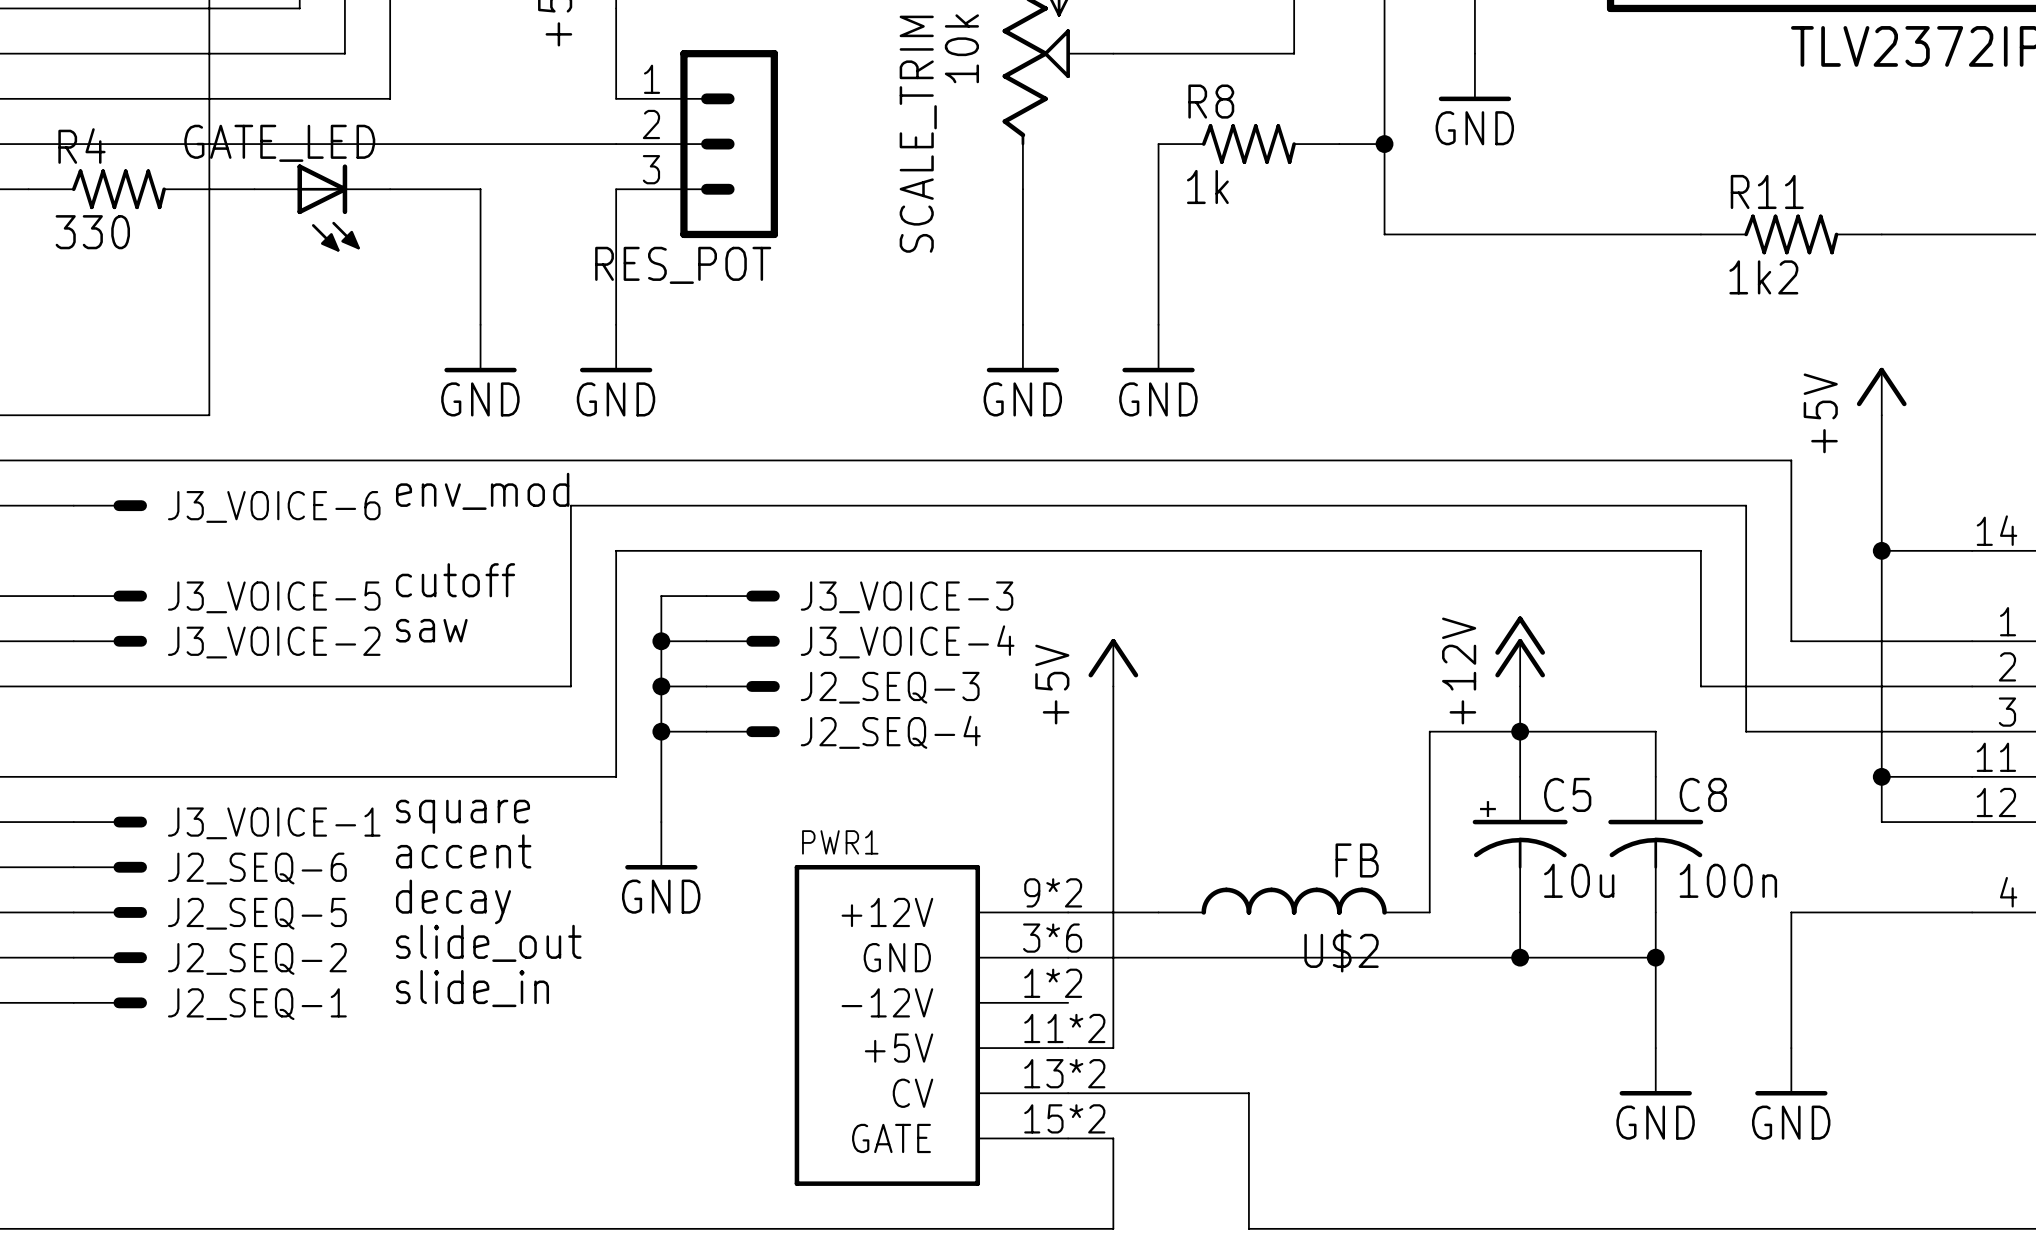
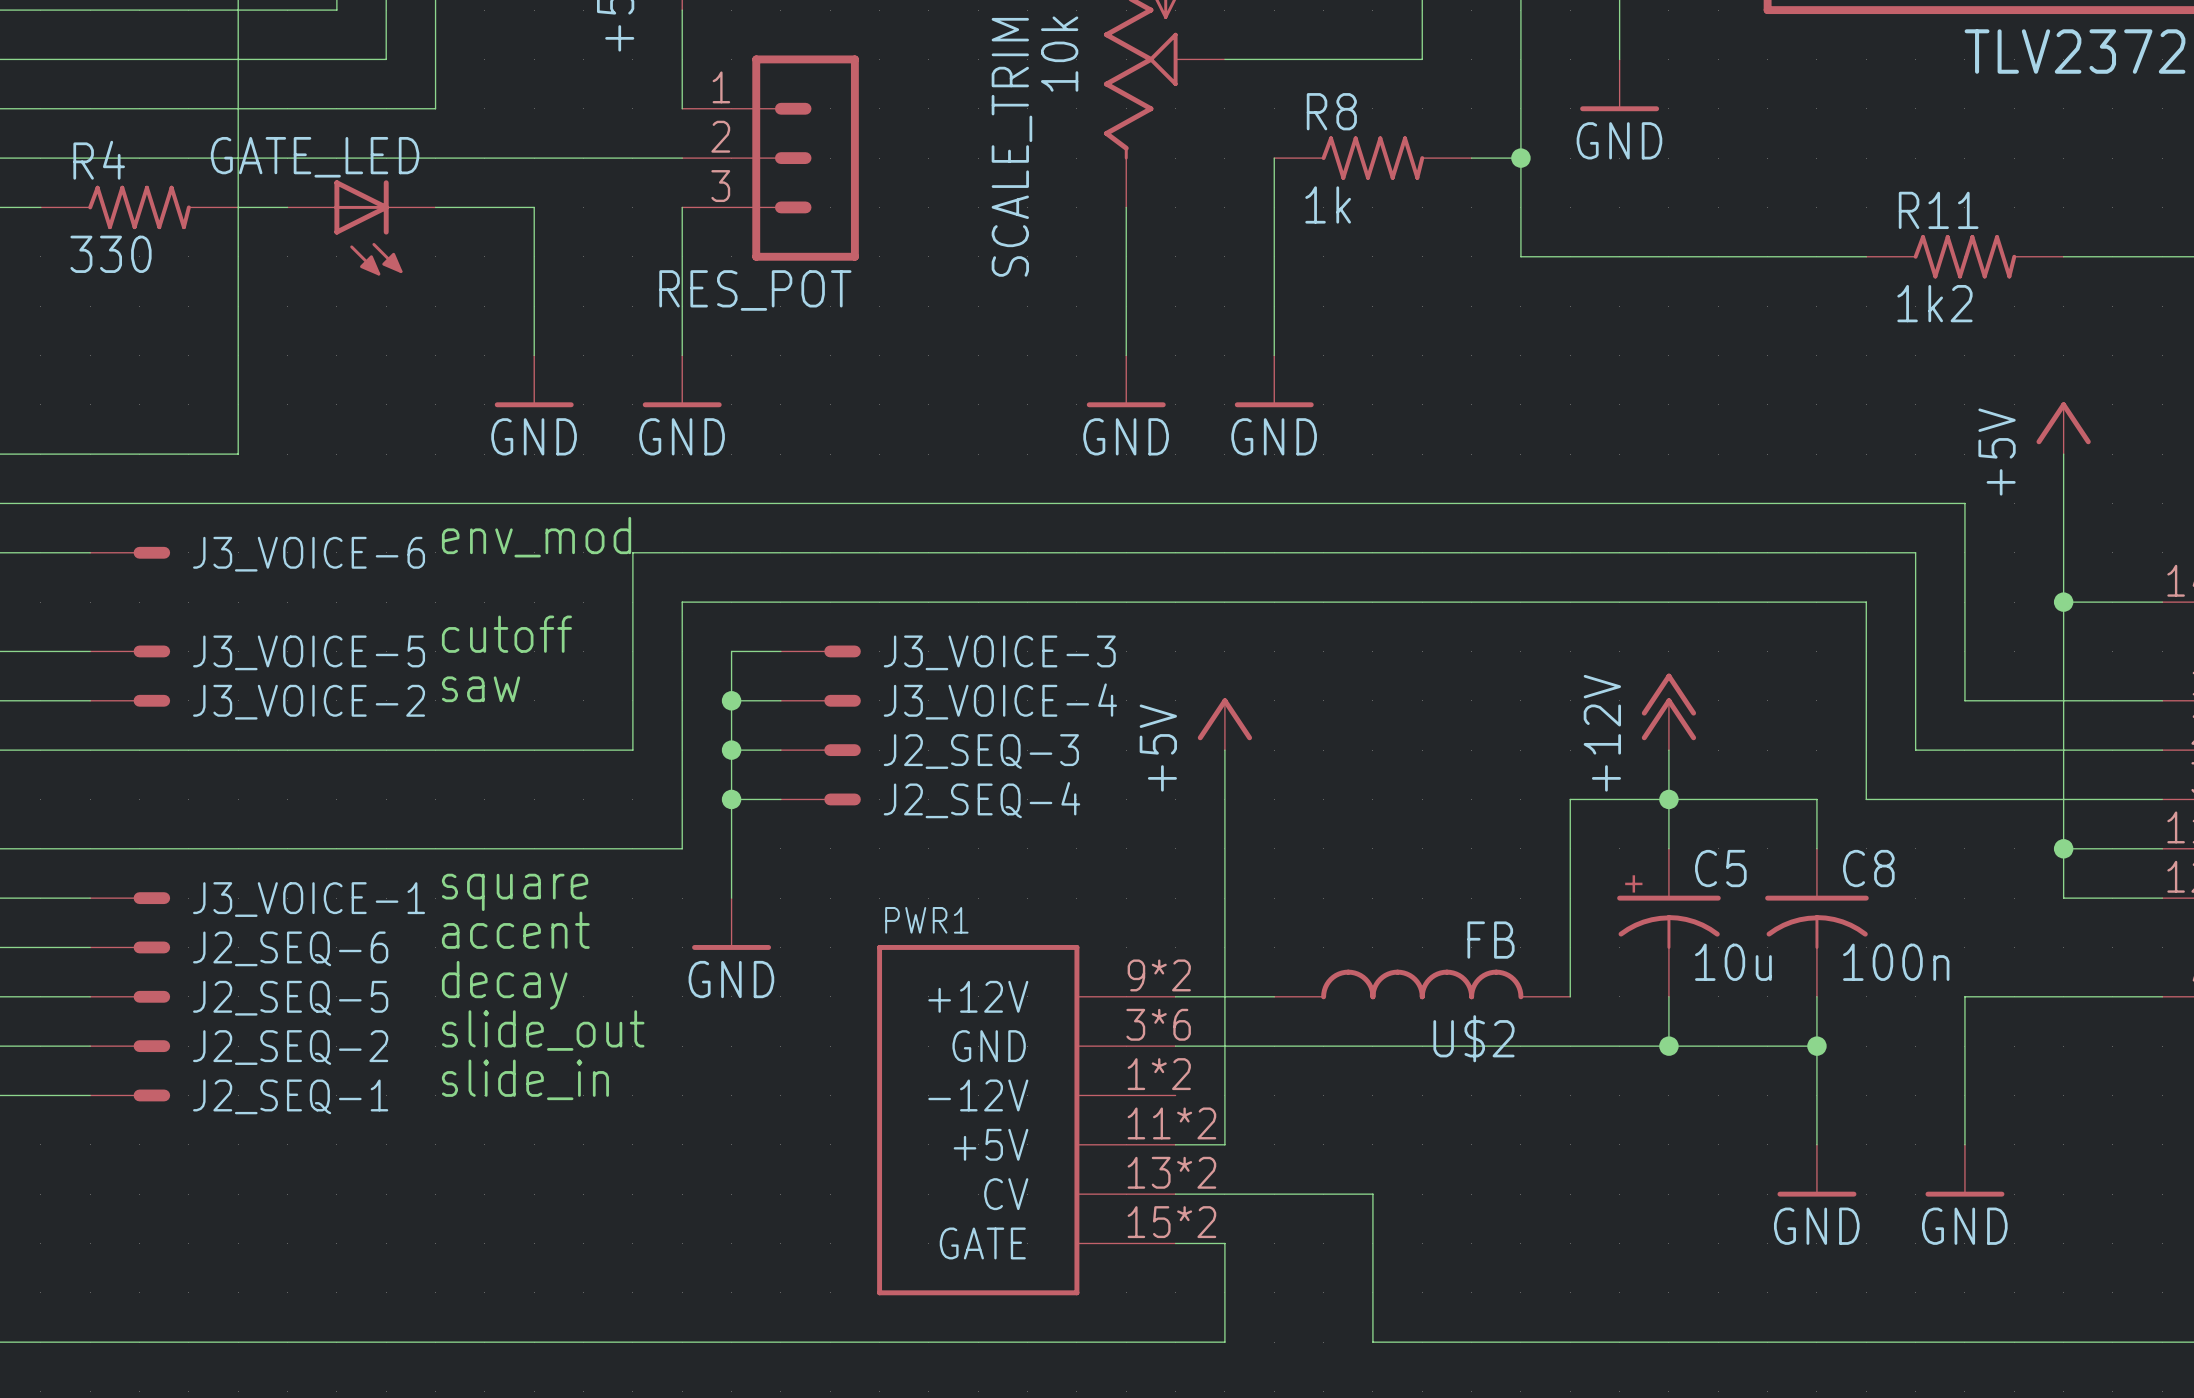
wire: (1700, 686) (1746, 686) (1746, 731) -> (1866, 750) (1866, 799) (1915, 799)

